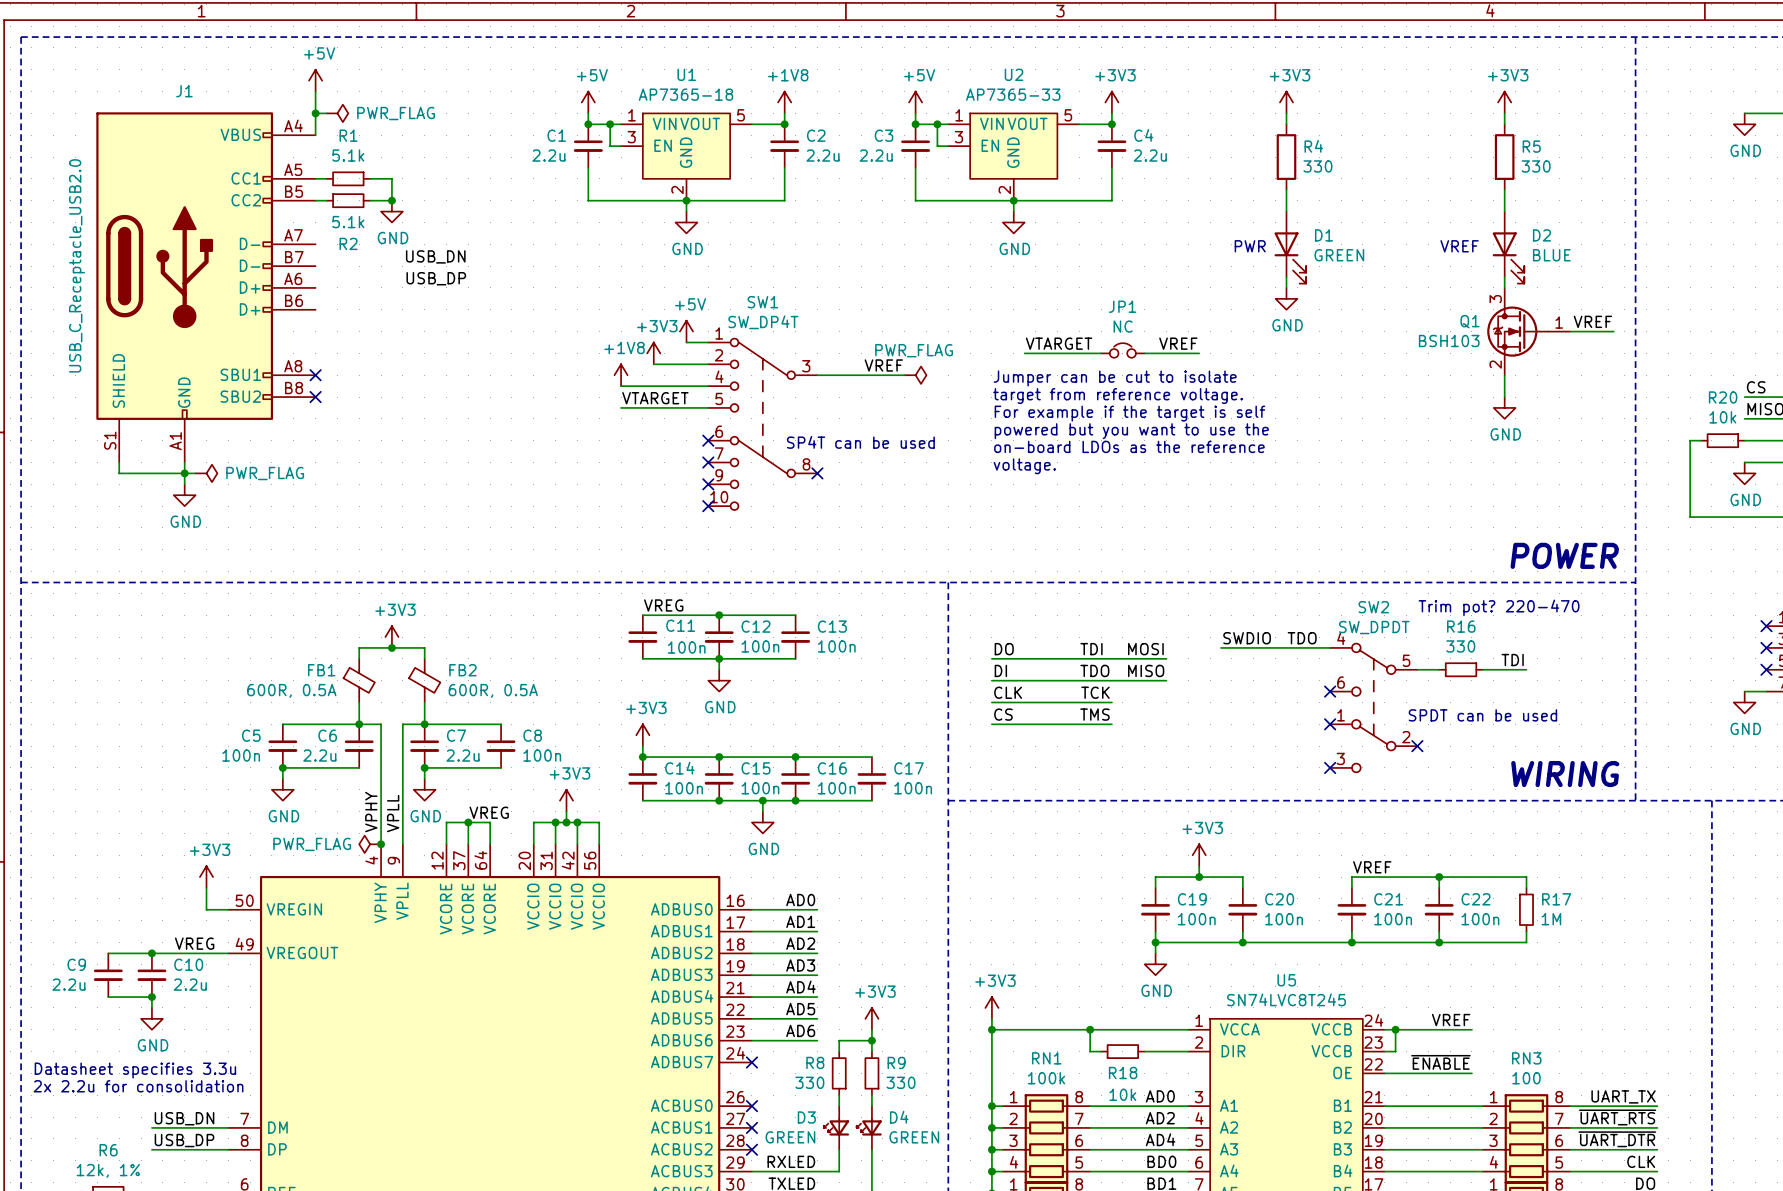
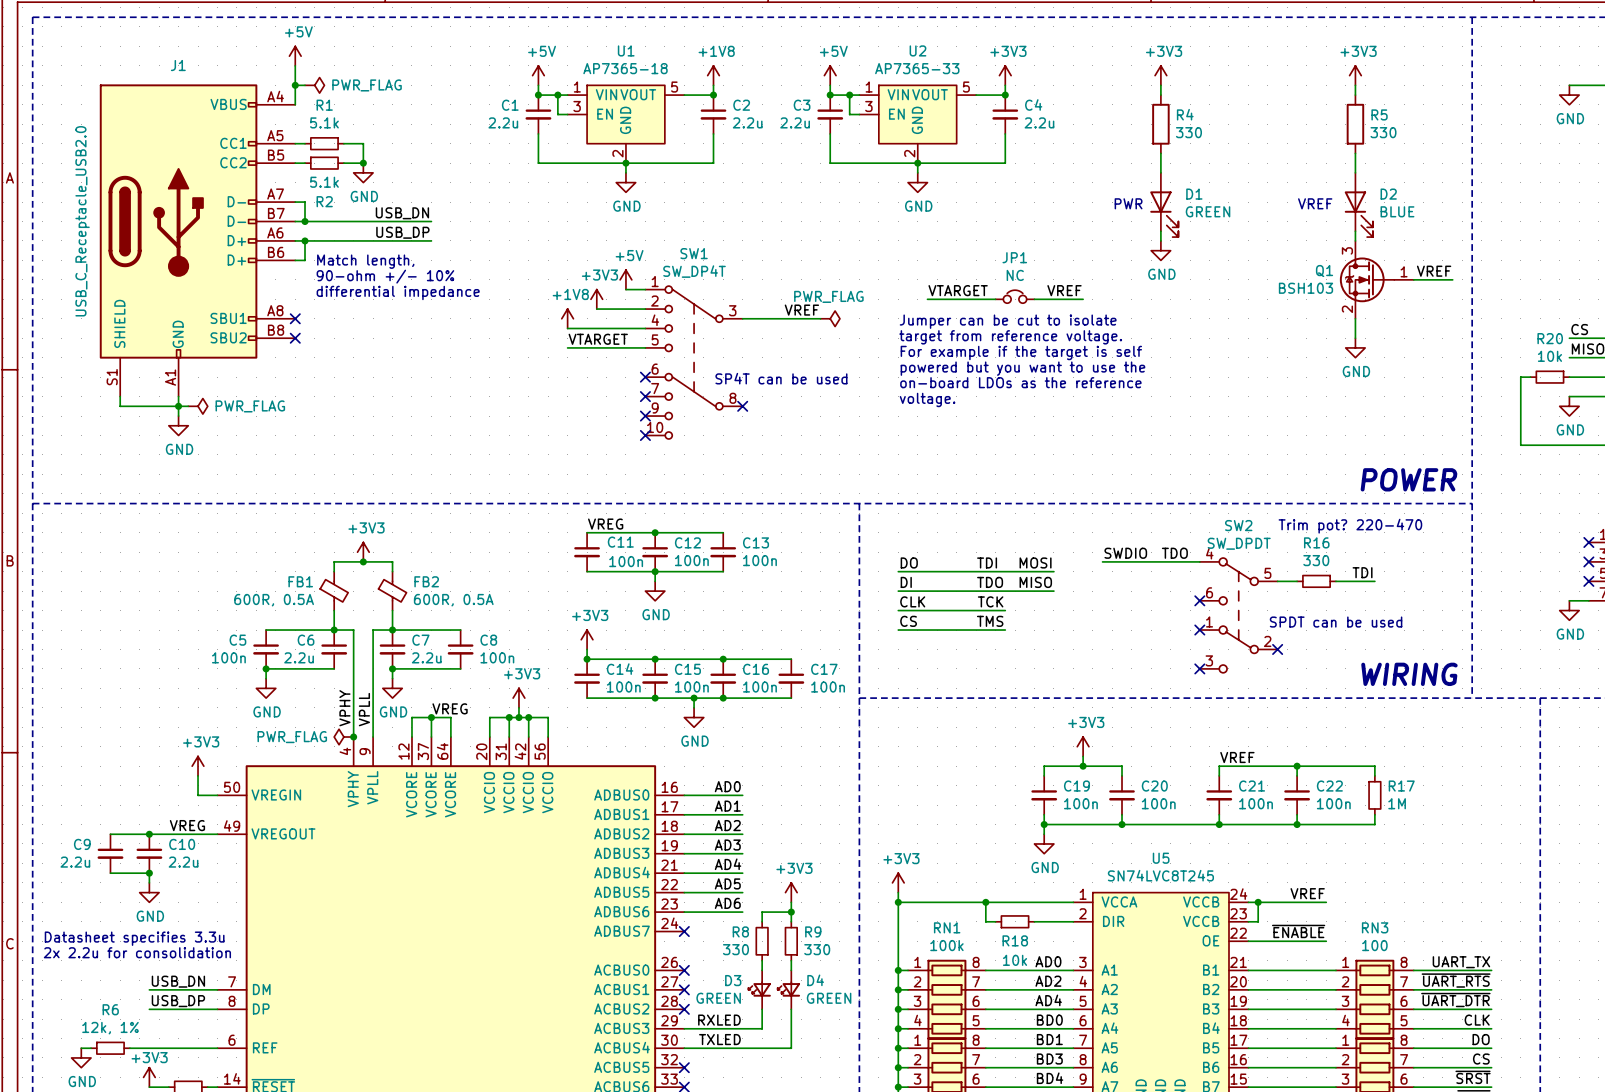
wire: none -> (295, 202) (305, 202) (305, 221)
wire: none -> (295, 221) (431, 221)
junction: none -> (305, 221)
wire: none -> (295, 240) (431, 240)
wire: none -> (305, 240) (305, 260) (295, 260)
junction: none -> (305, 240)
text: none -> Match length, (365, 261)
text: none -> 90-ohm +/- 10% (385, 276)
text: none -> differential impedance (398, 292)

